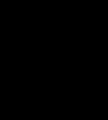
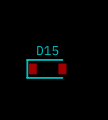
D15: none -> (46, 68)

